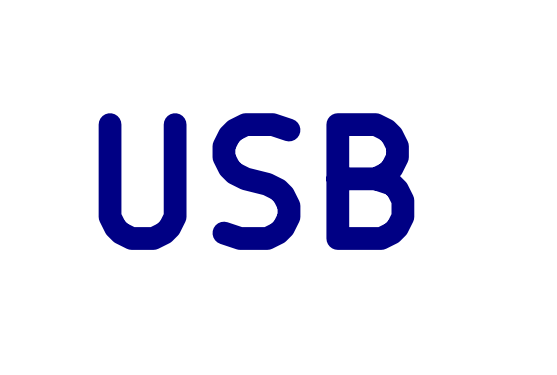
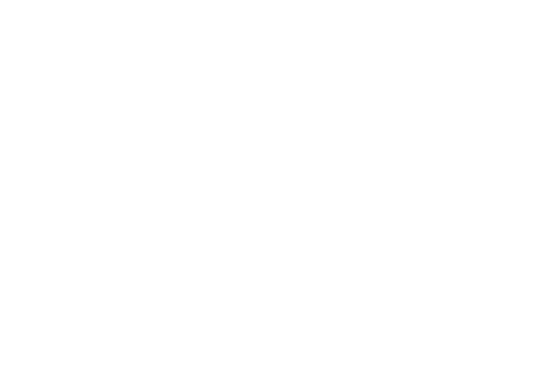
text: USB (256, 181) -> none

